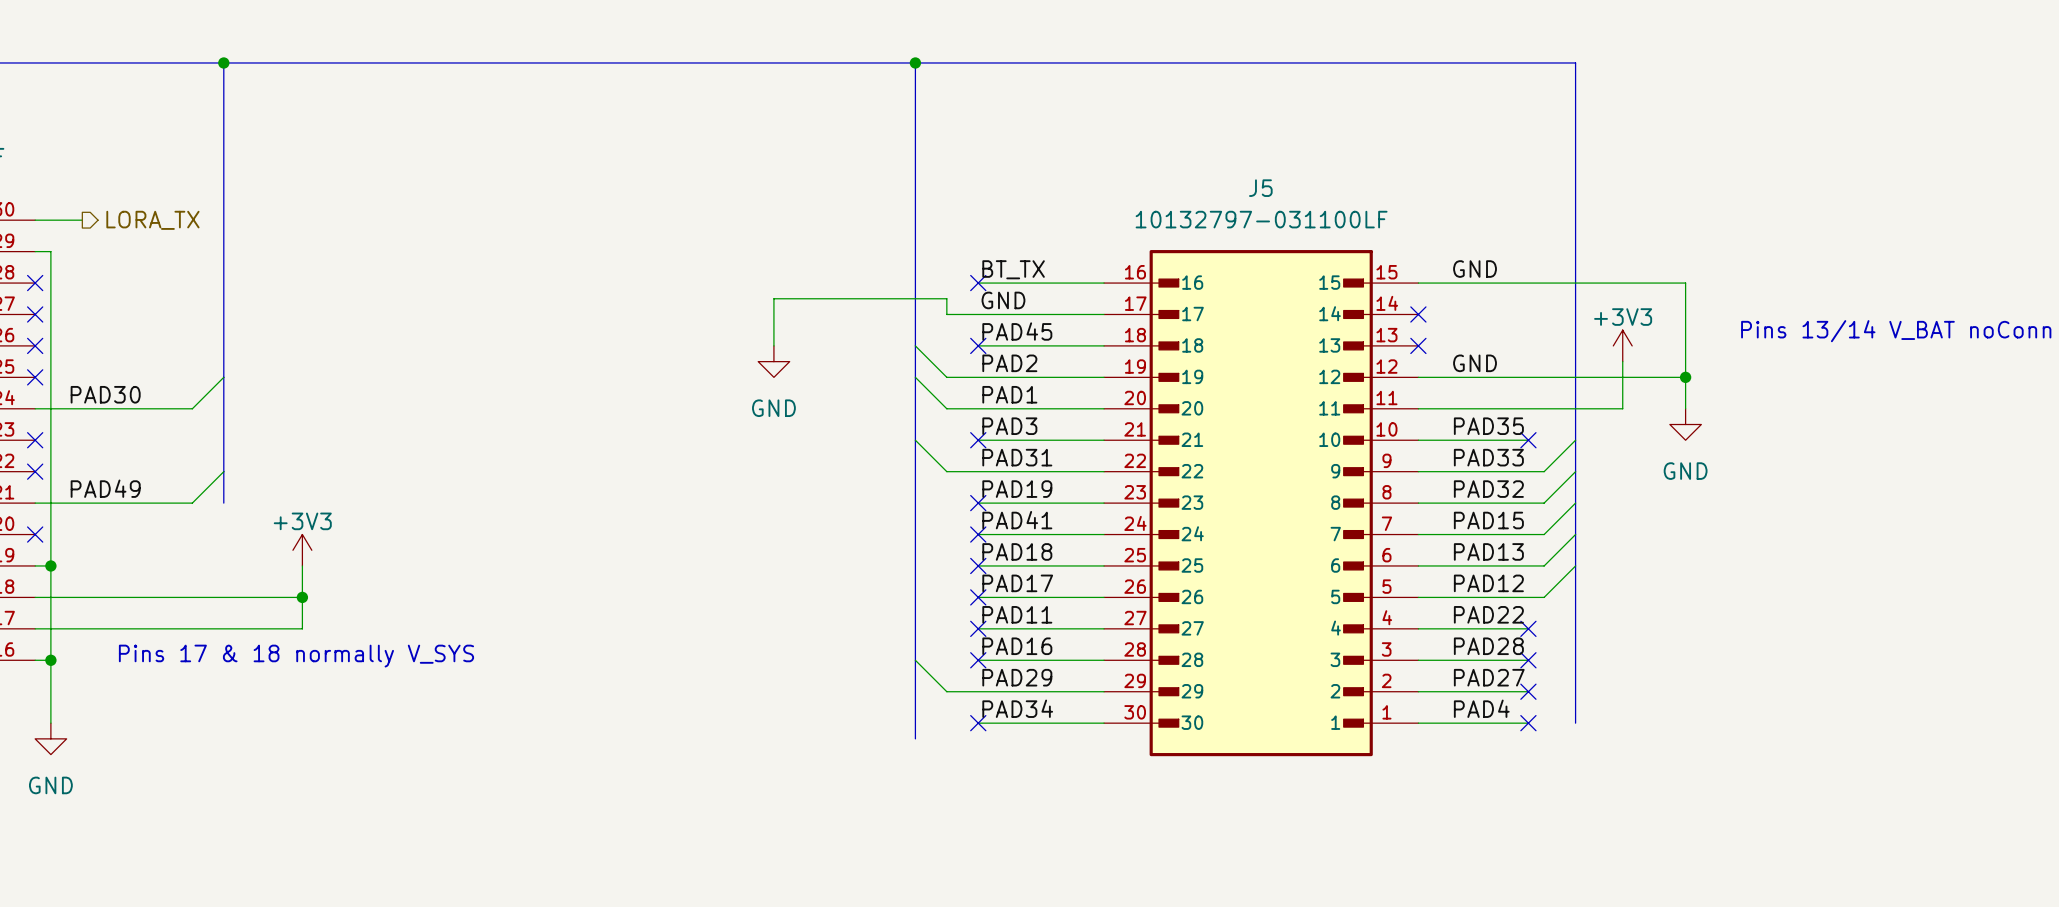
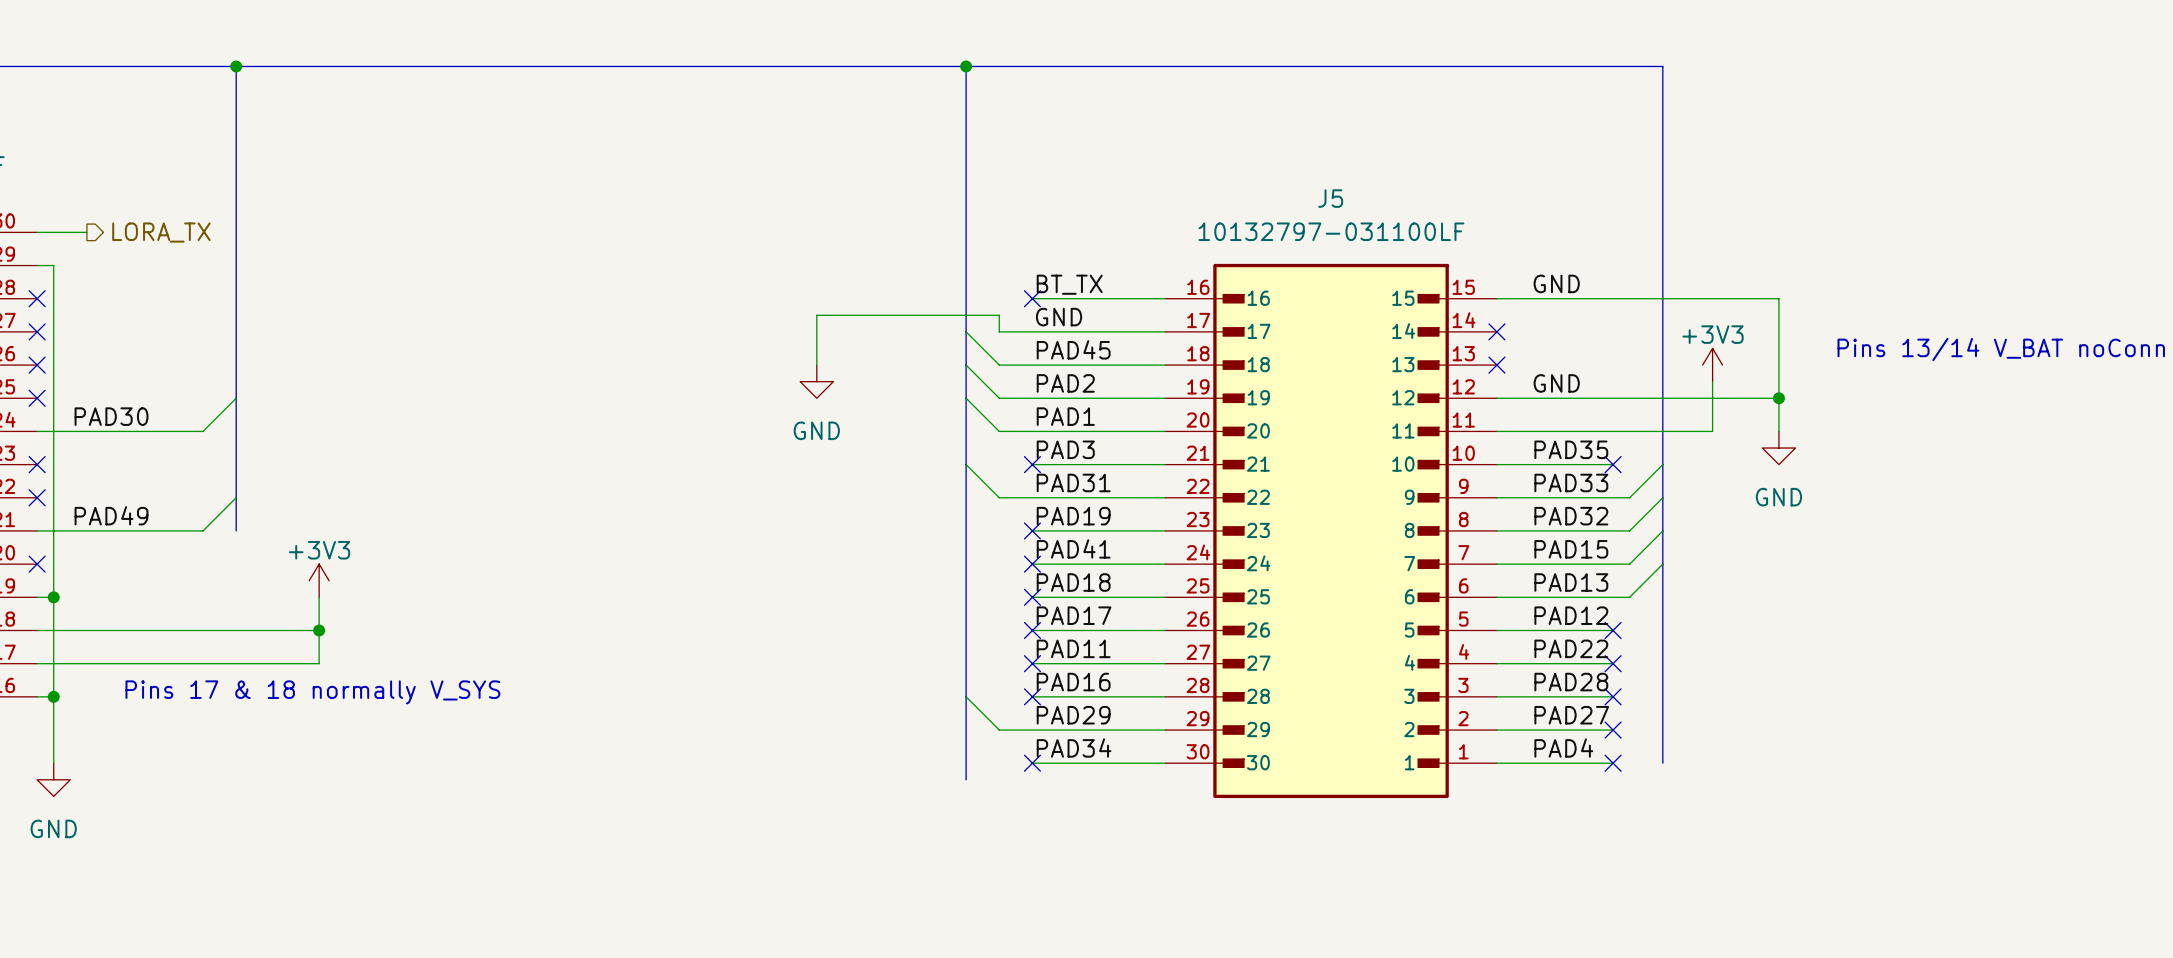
wire: none -> (966, 331) (999, 365) (1032, 365)
no-connect mark: (978, 345) -> none
wire: (1575, 565) (1544, 597) (1528, 597) -> none
no-connect mark: none -> (1613, 630)

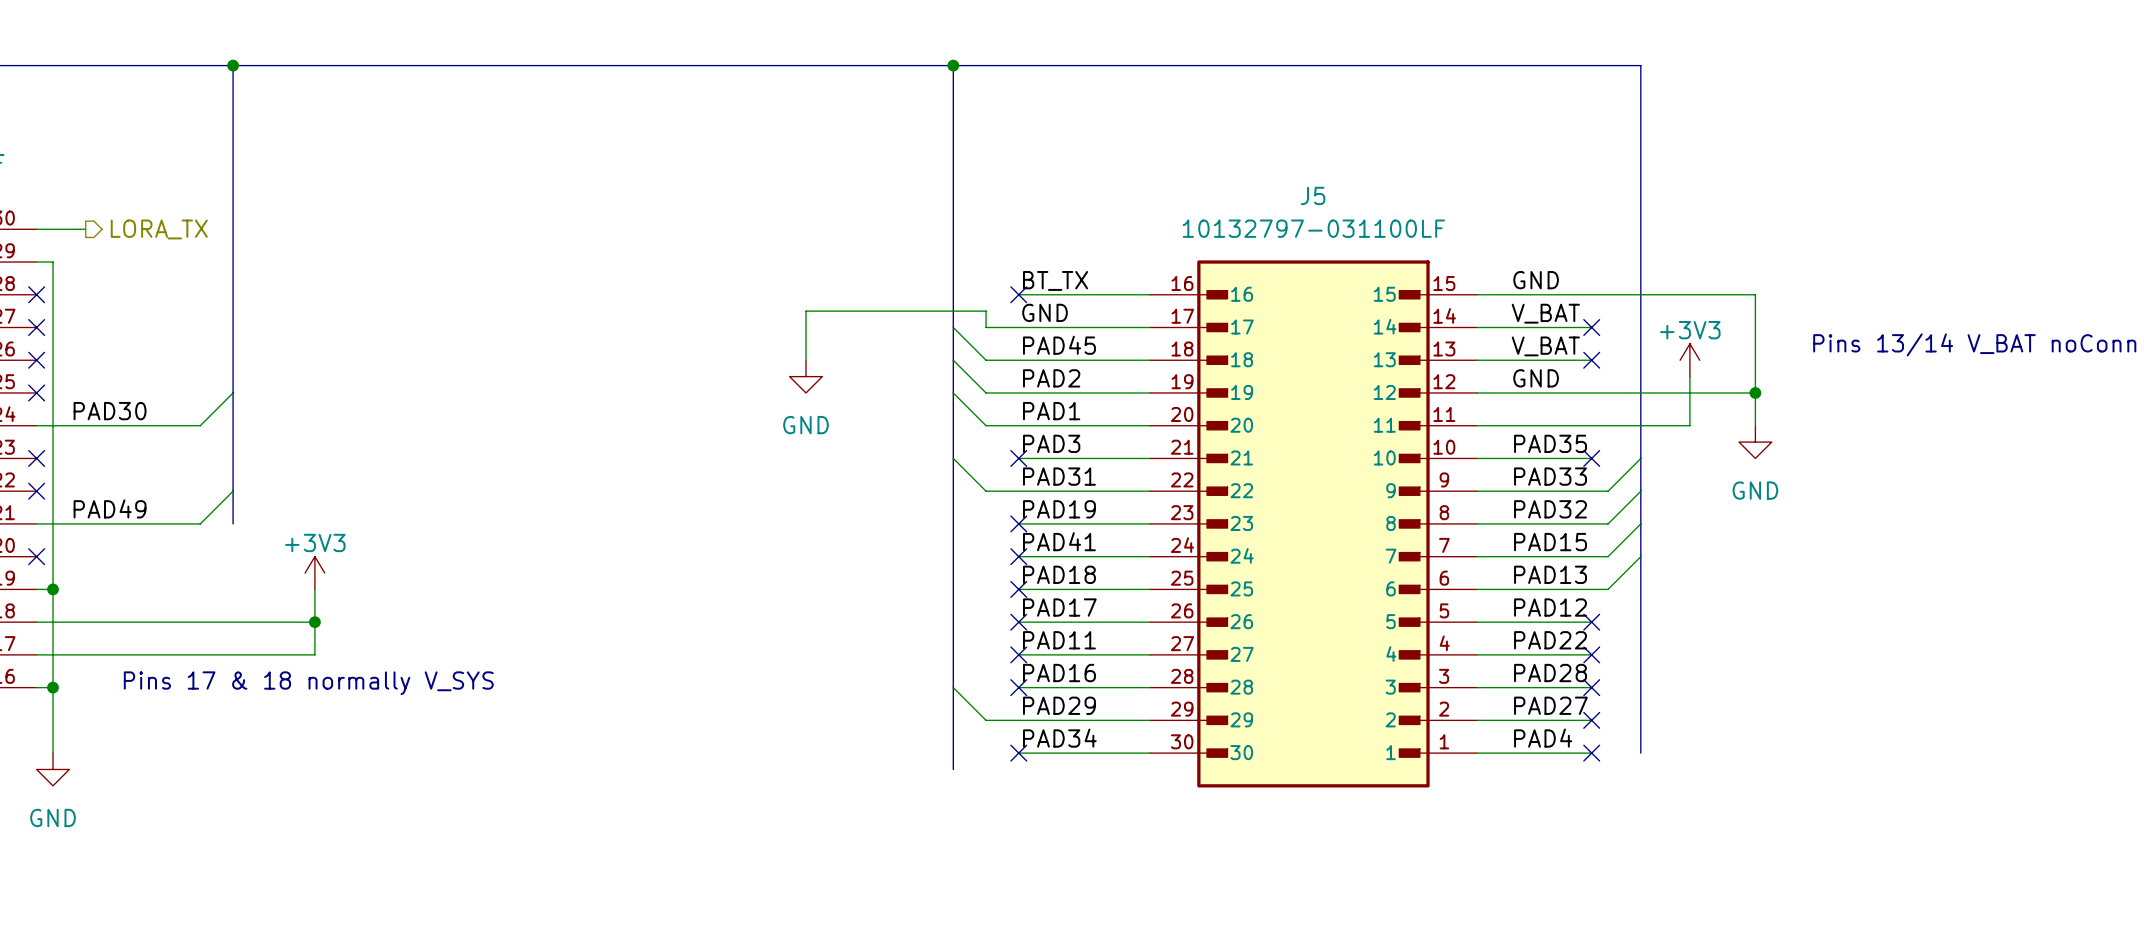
label: none -> V_BAT (1545, 313)
wire: none -> (1477, 327) (1591, 327)
no-connect mark: (1496, 331) -> none
no-connect mark: none -> (1591, 327)
label: none -> V_BAT (1545, 346)
wire: none -> (1477, 360) (1591, 360)
no-connect mark: (1496, 365) -> none
no-connect mark: none -> (1591, 360)

